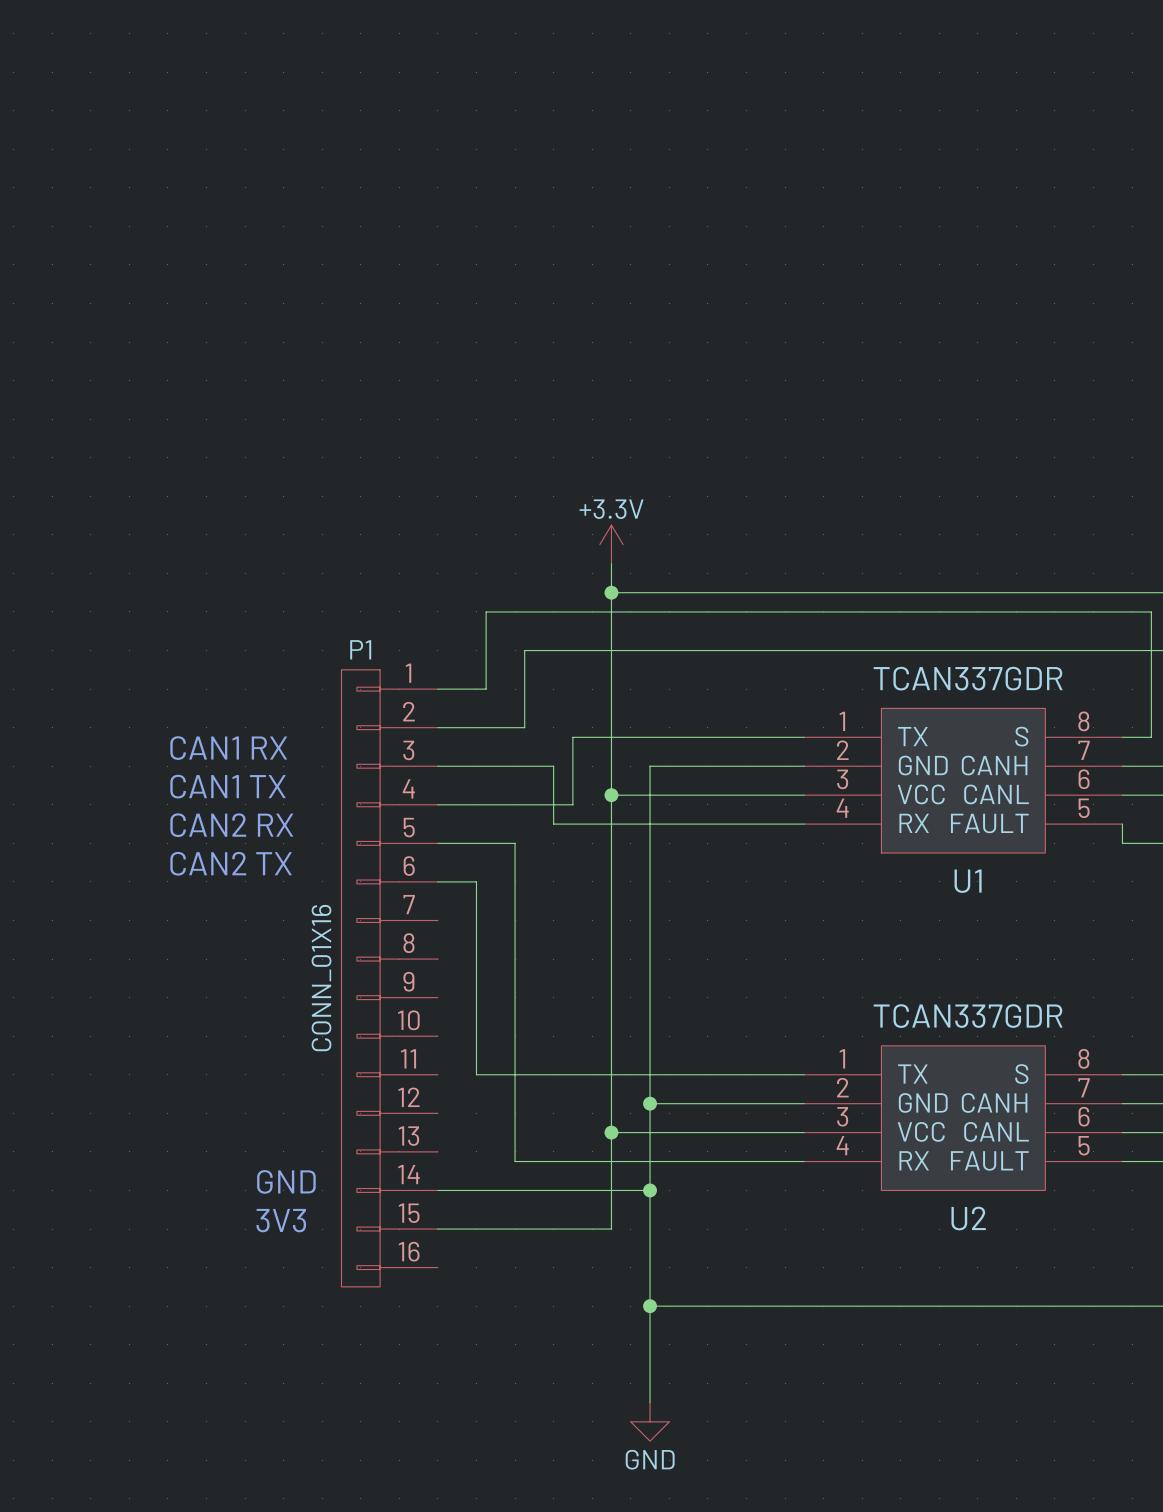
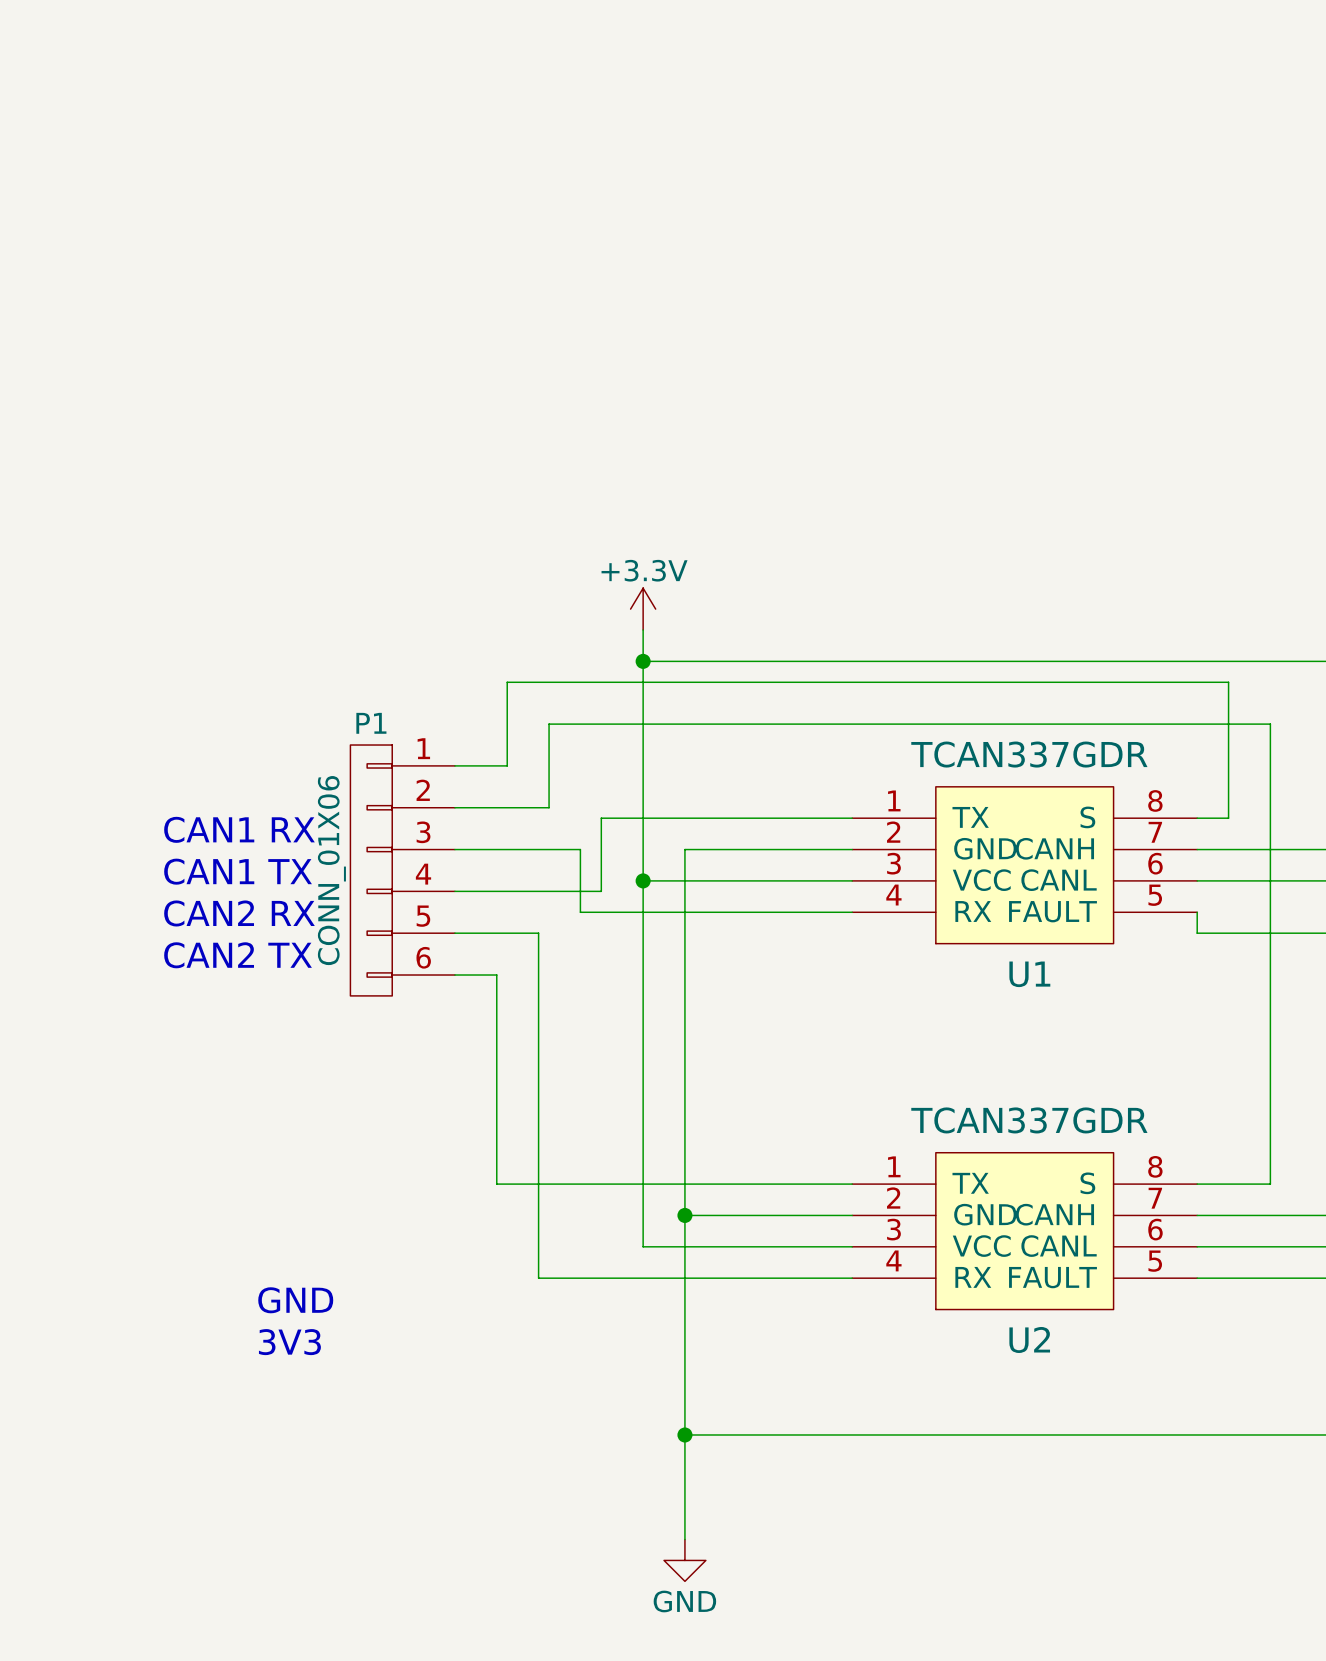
P1 symbol: [341, 669, 438, 1287] -> [350, 745, 455, 996]
P1 value: CONN_01X16 (321, 978) -> CONN_01X06 (331, 870)
wire: (611, 1132) (611, 1229) (437, 1229) -> none
junction: (611, 1132) -> none
wire: (437, 1190) (650, 1190) -> none
junction: (650, 1190) -> none

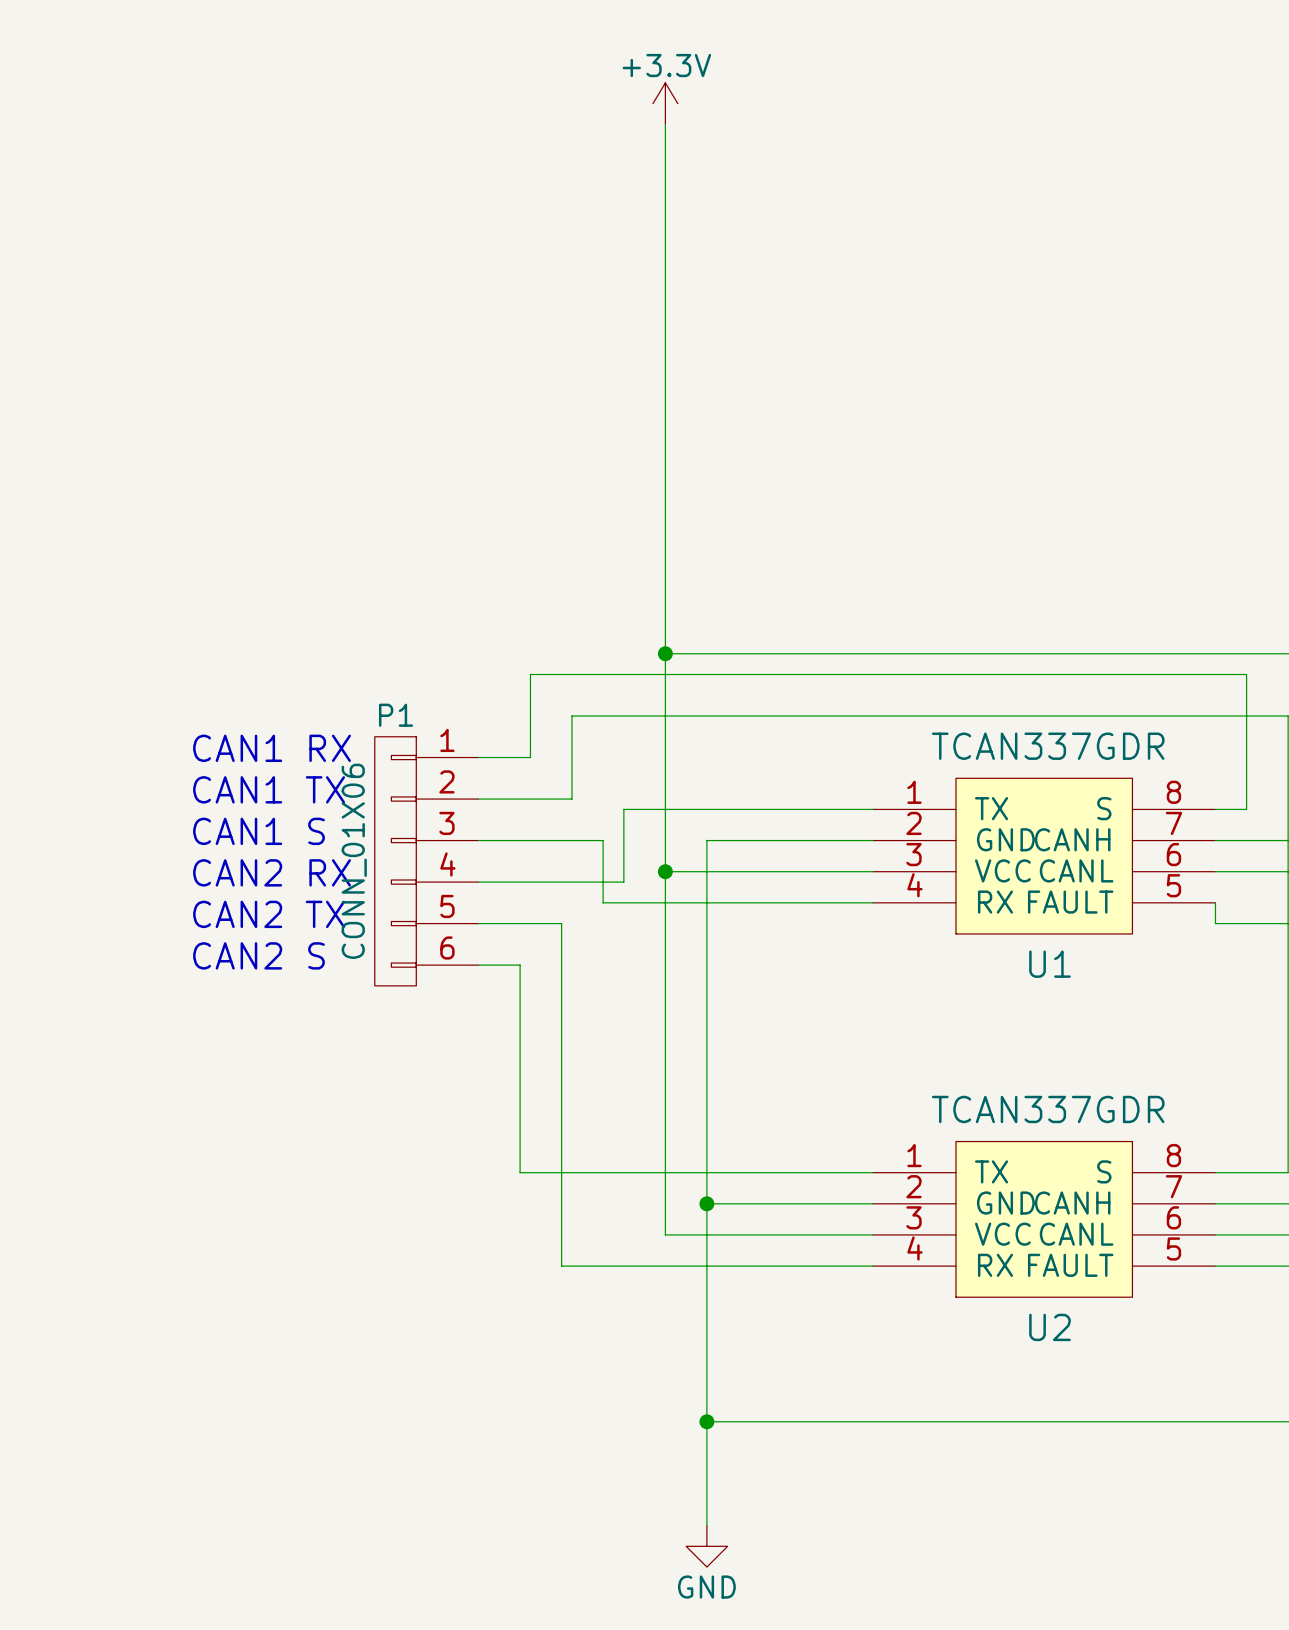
power symbol: none -> +3.3V (665, 103)
wire: none -> (665, 124) (665, 622)
power symbol: +3.3V (643, 609) -> none
text: none -> CAN1 RX (272, 748)
text: none -> CAN1 TX (269, 789)
text: CAN1 RX (239, 829) -> CAN1 S (258, 831)
text: CAN1 TX (238, 871) -> CAN2 RX (272, 872)
text: CAN2 RX (239, 913) -> CAN2 TX (269, 914)
text: CAN2 TX (238, 955) -> CAN2 S (258, 955)
text: GND (295, 1300) -> none
text: 3V3 (289, 1342) -> none

